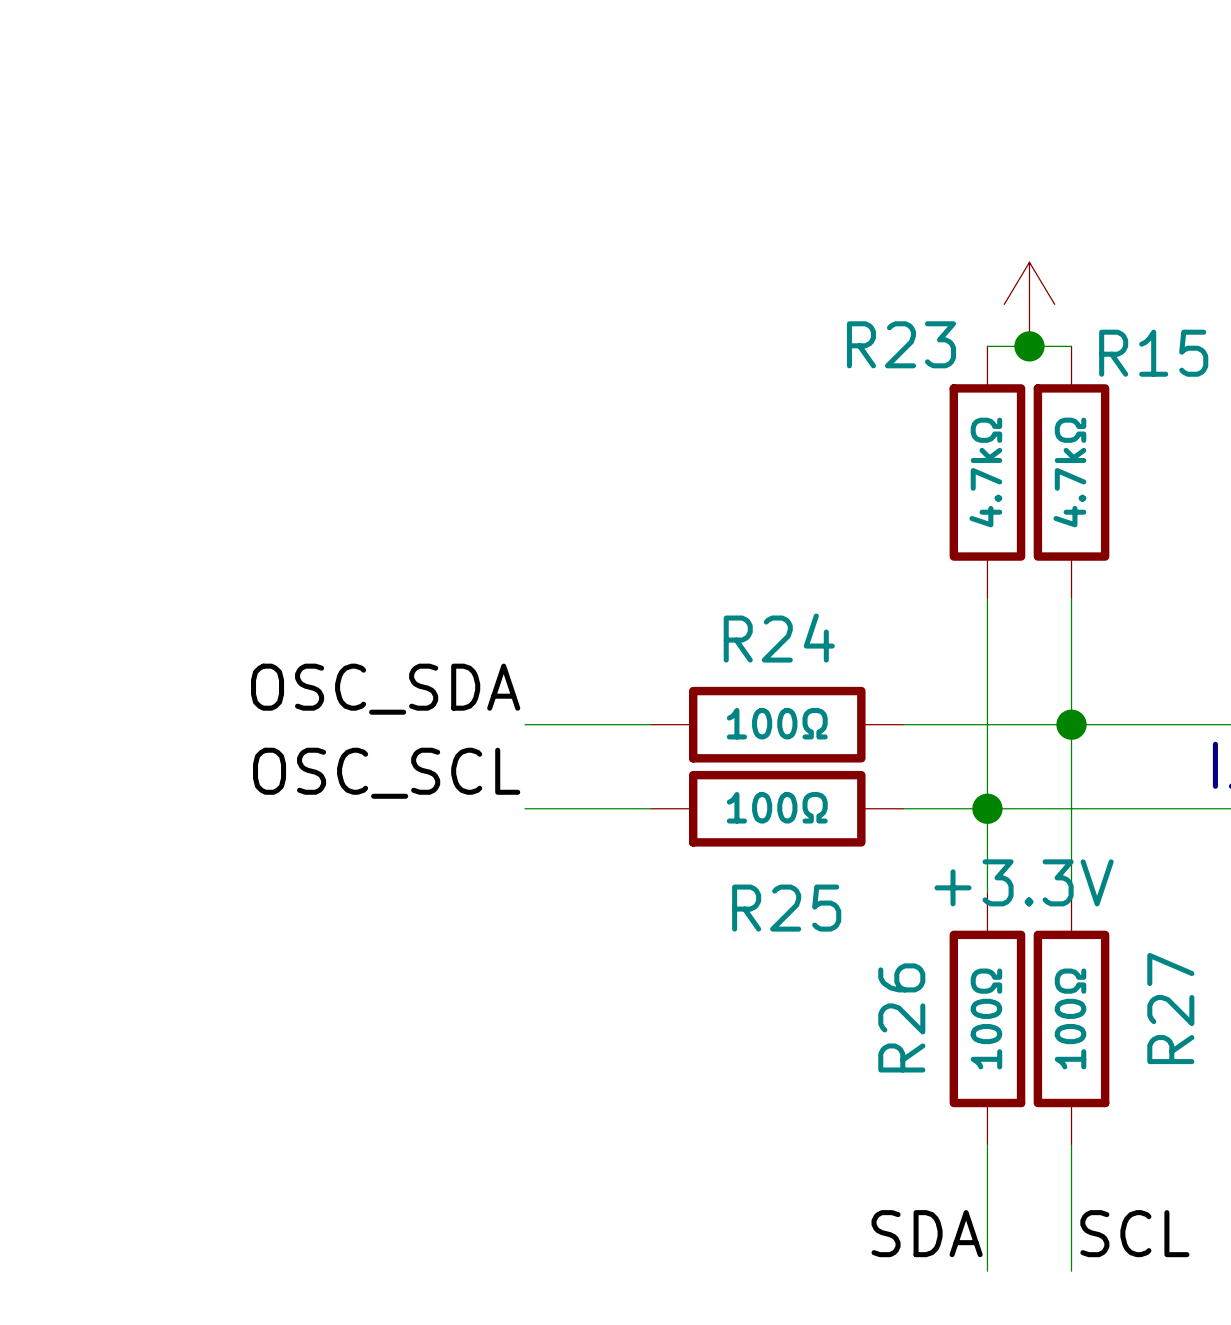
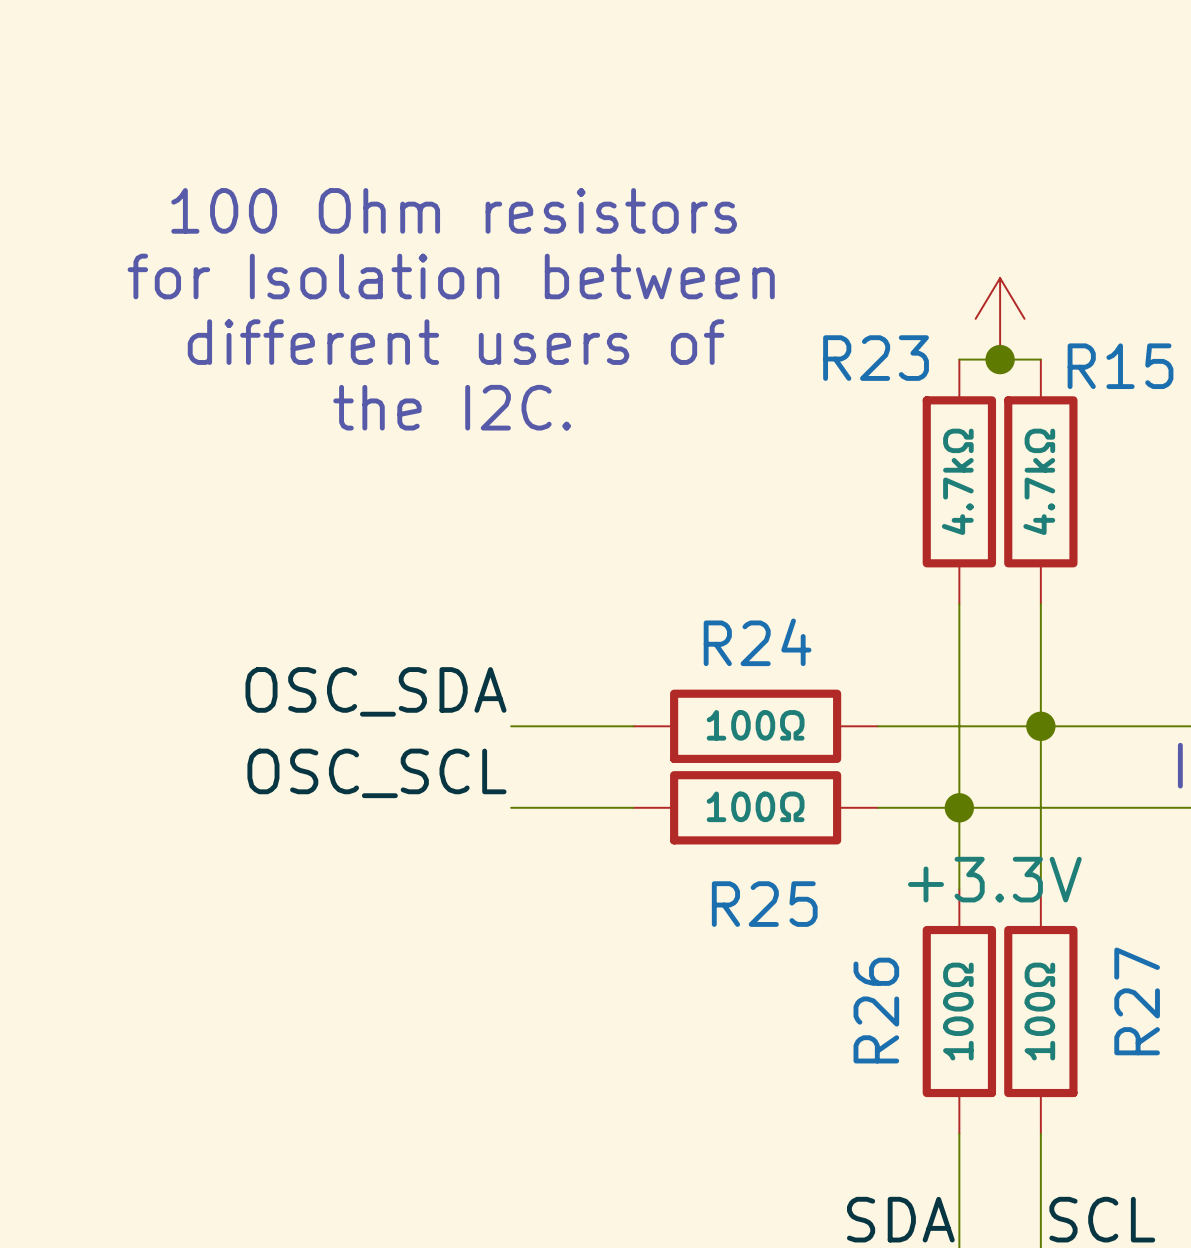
text: none -> 100 Ohm resistors (454, 210)
text: none -> for Isolation between (451, 276)
text: none -> different users of (456, 342)
text: none -> the I2C. (452, 407)

